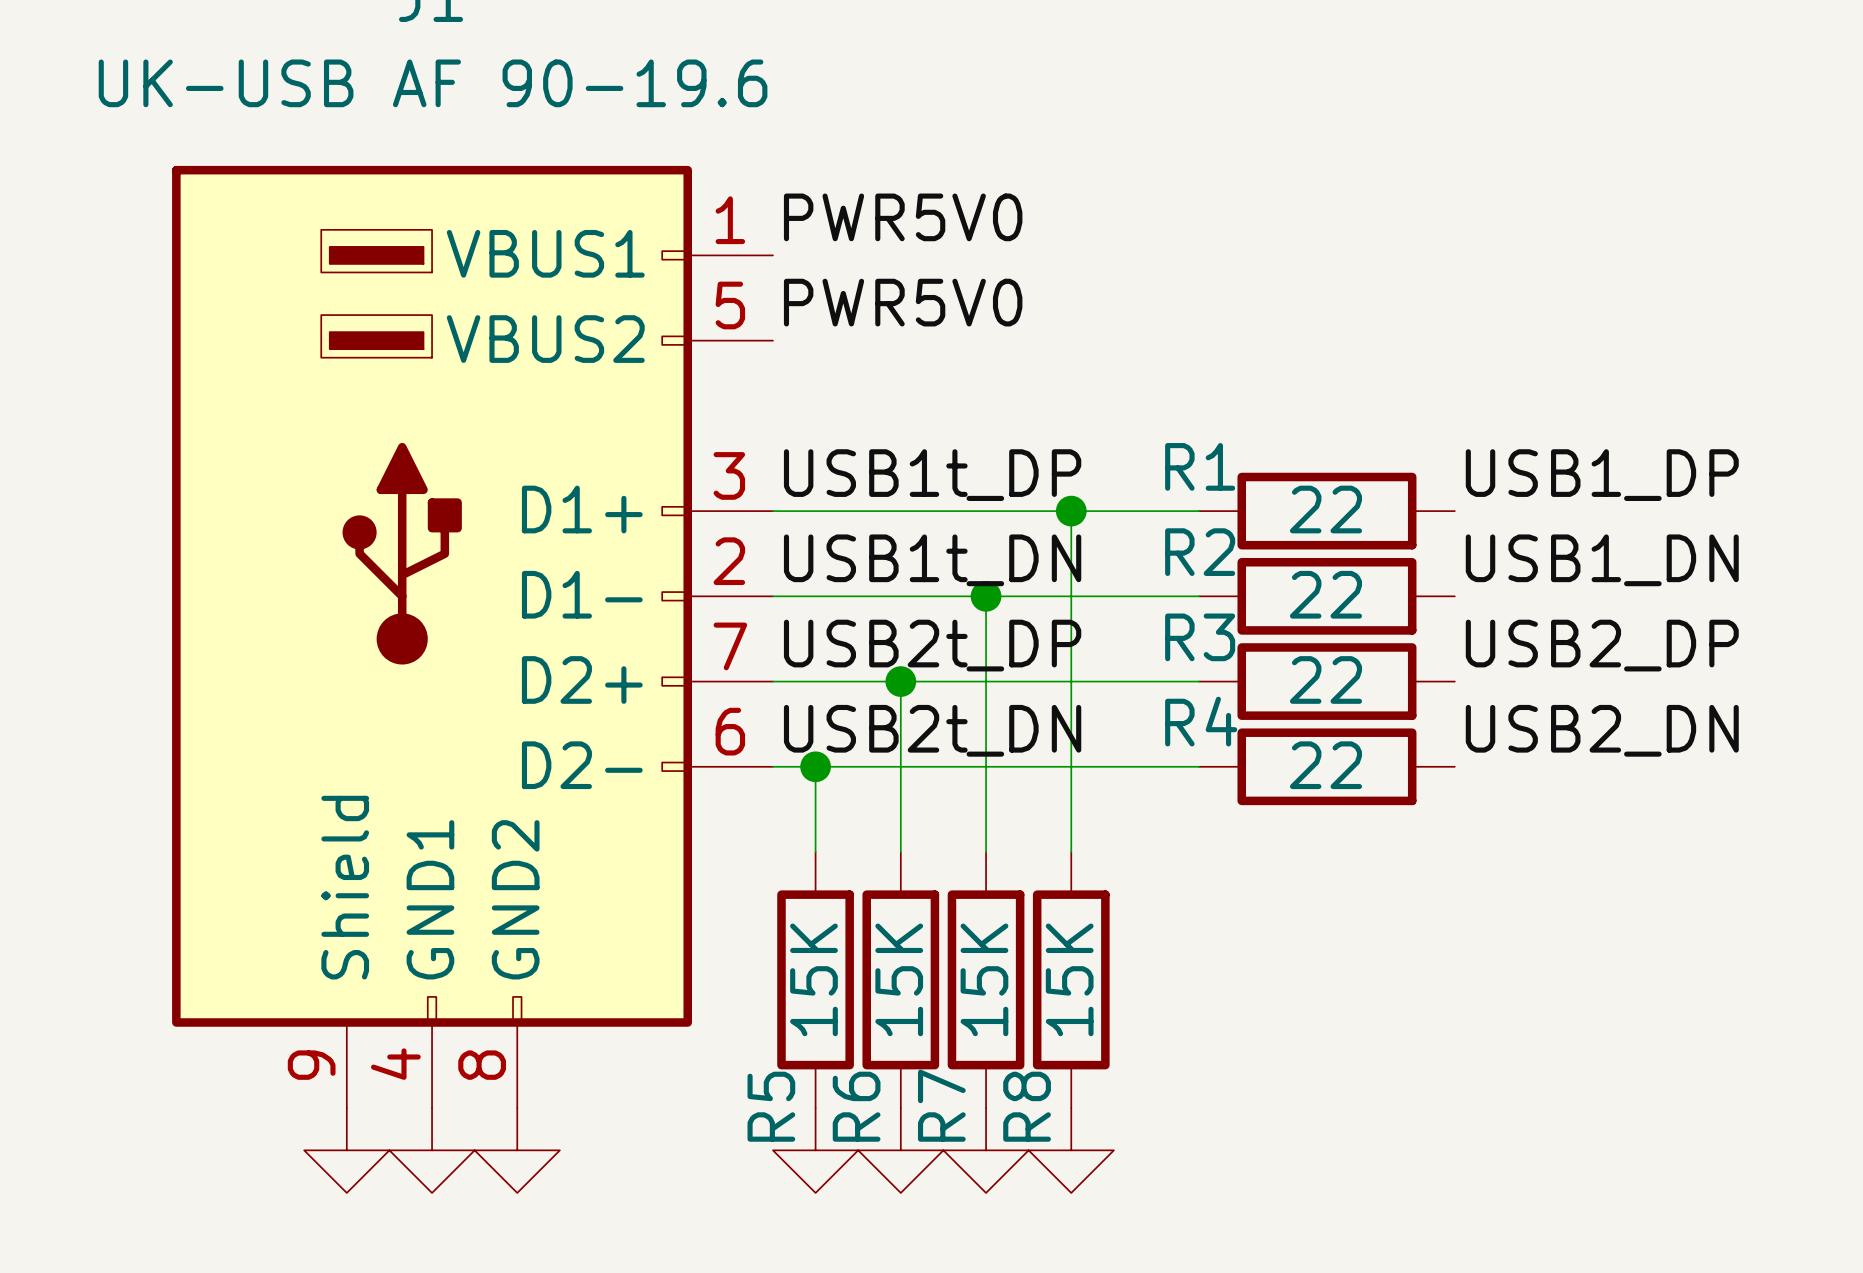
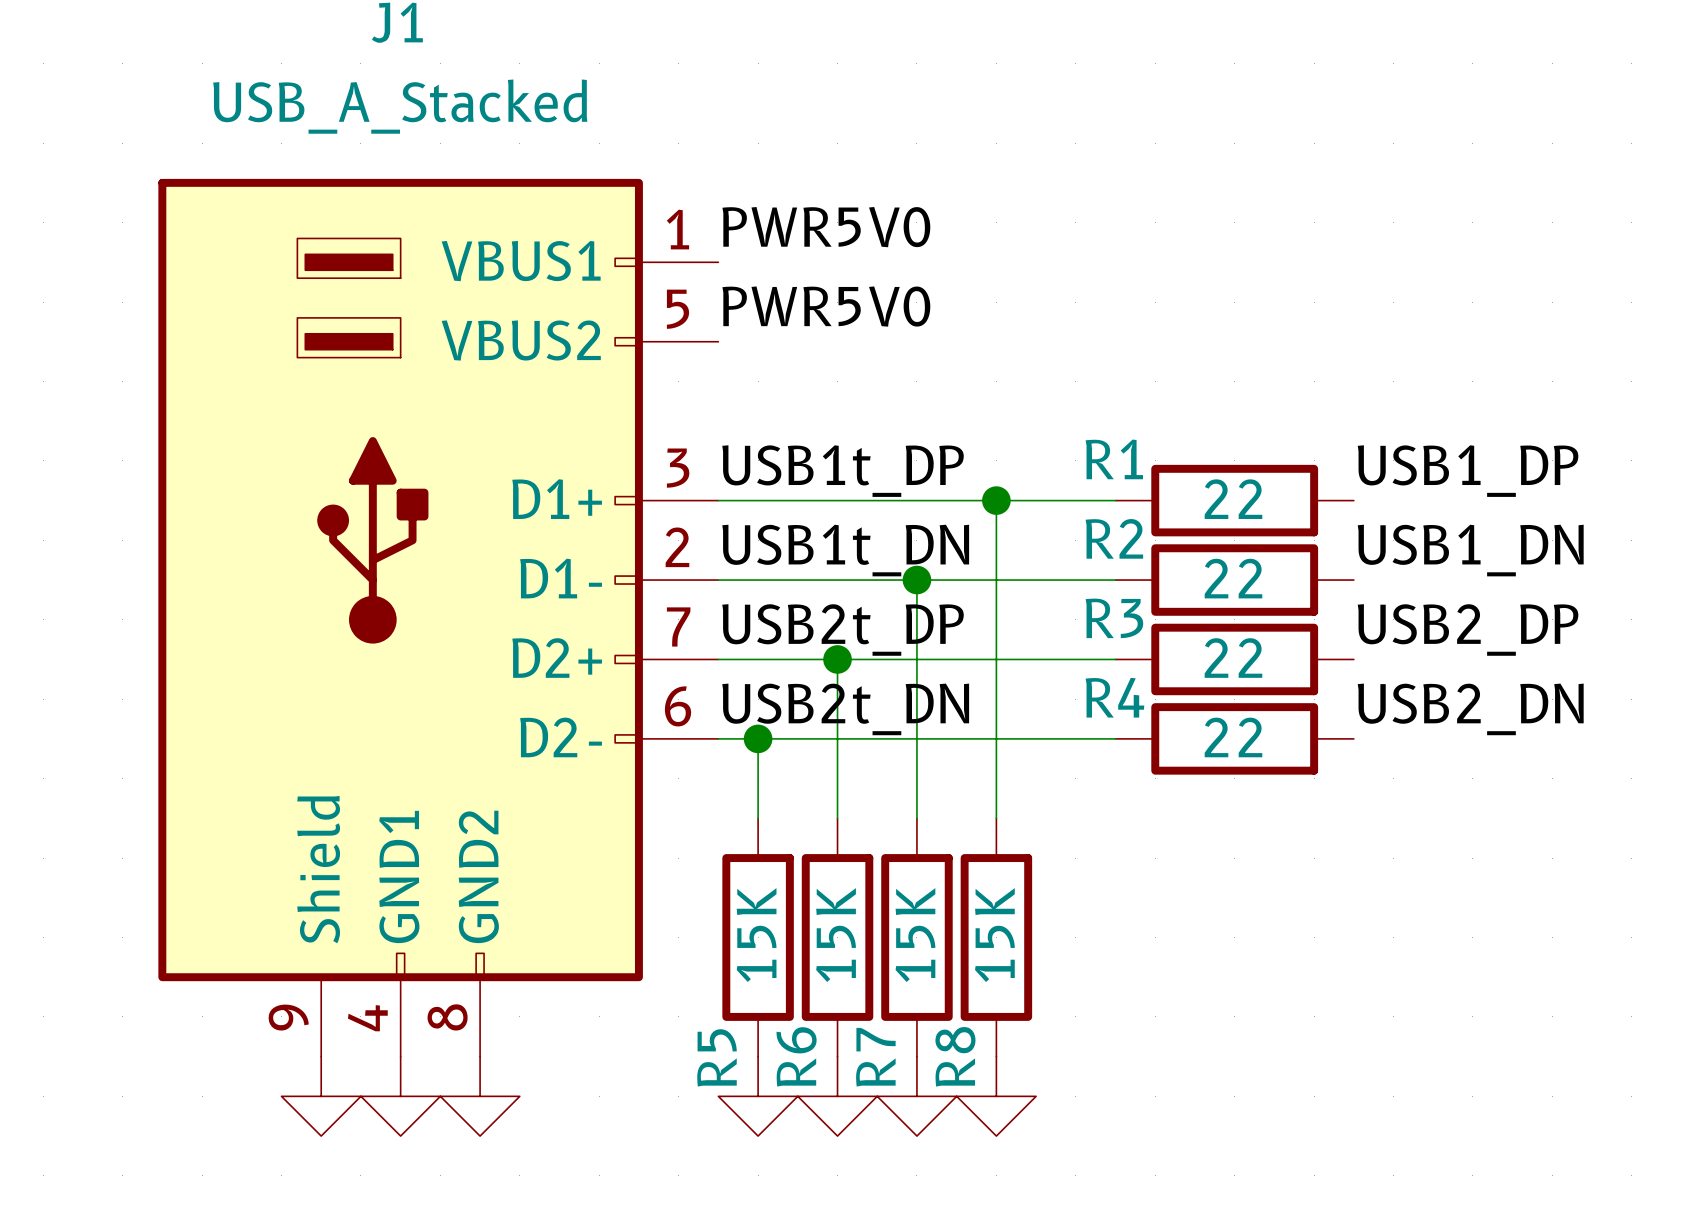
J1 value: UK-USB AF 90-19.6 (433, 83) -> USB_A_Stacked (400, 106)

